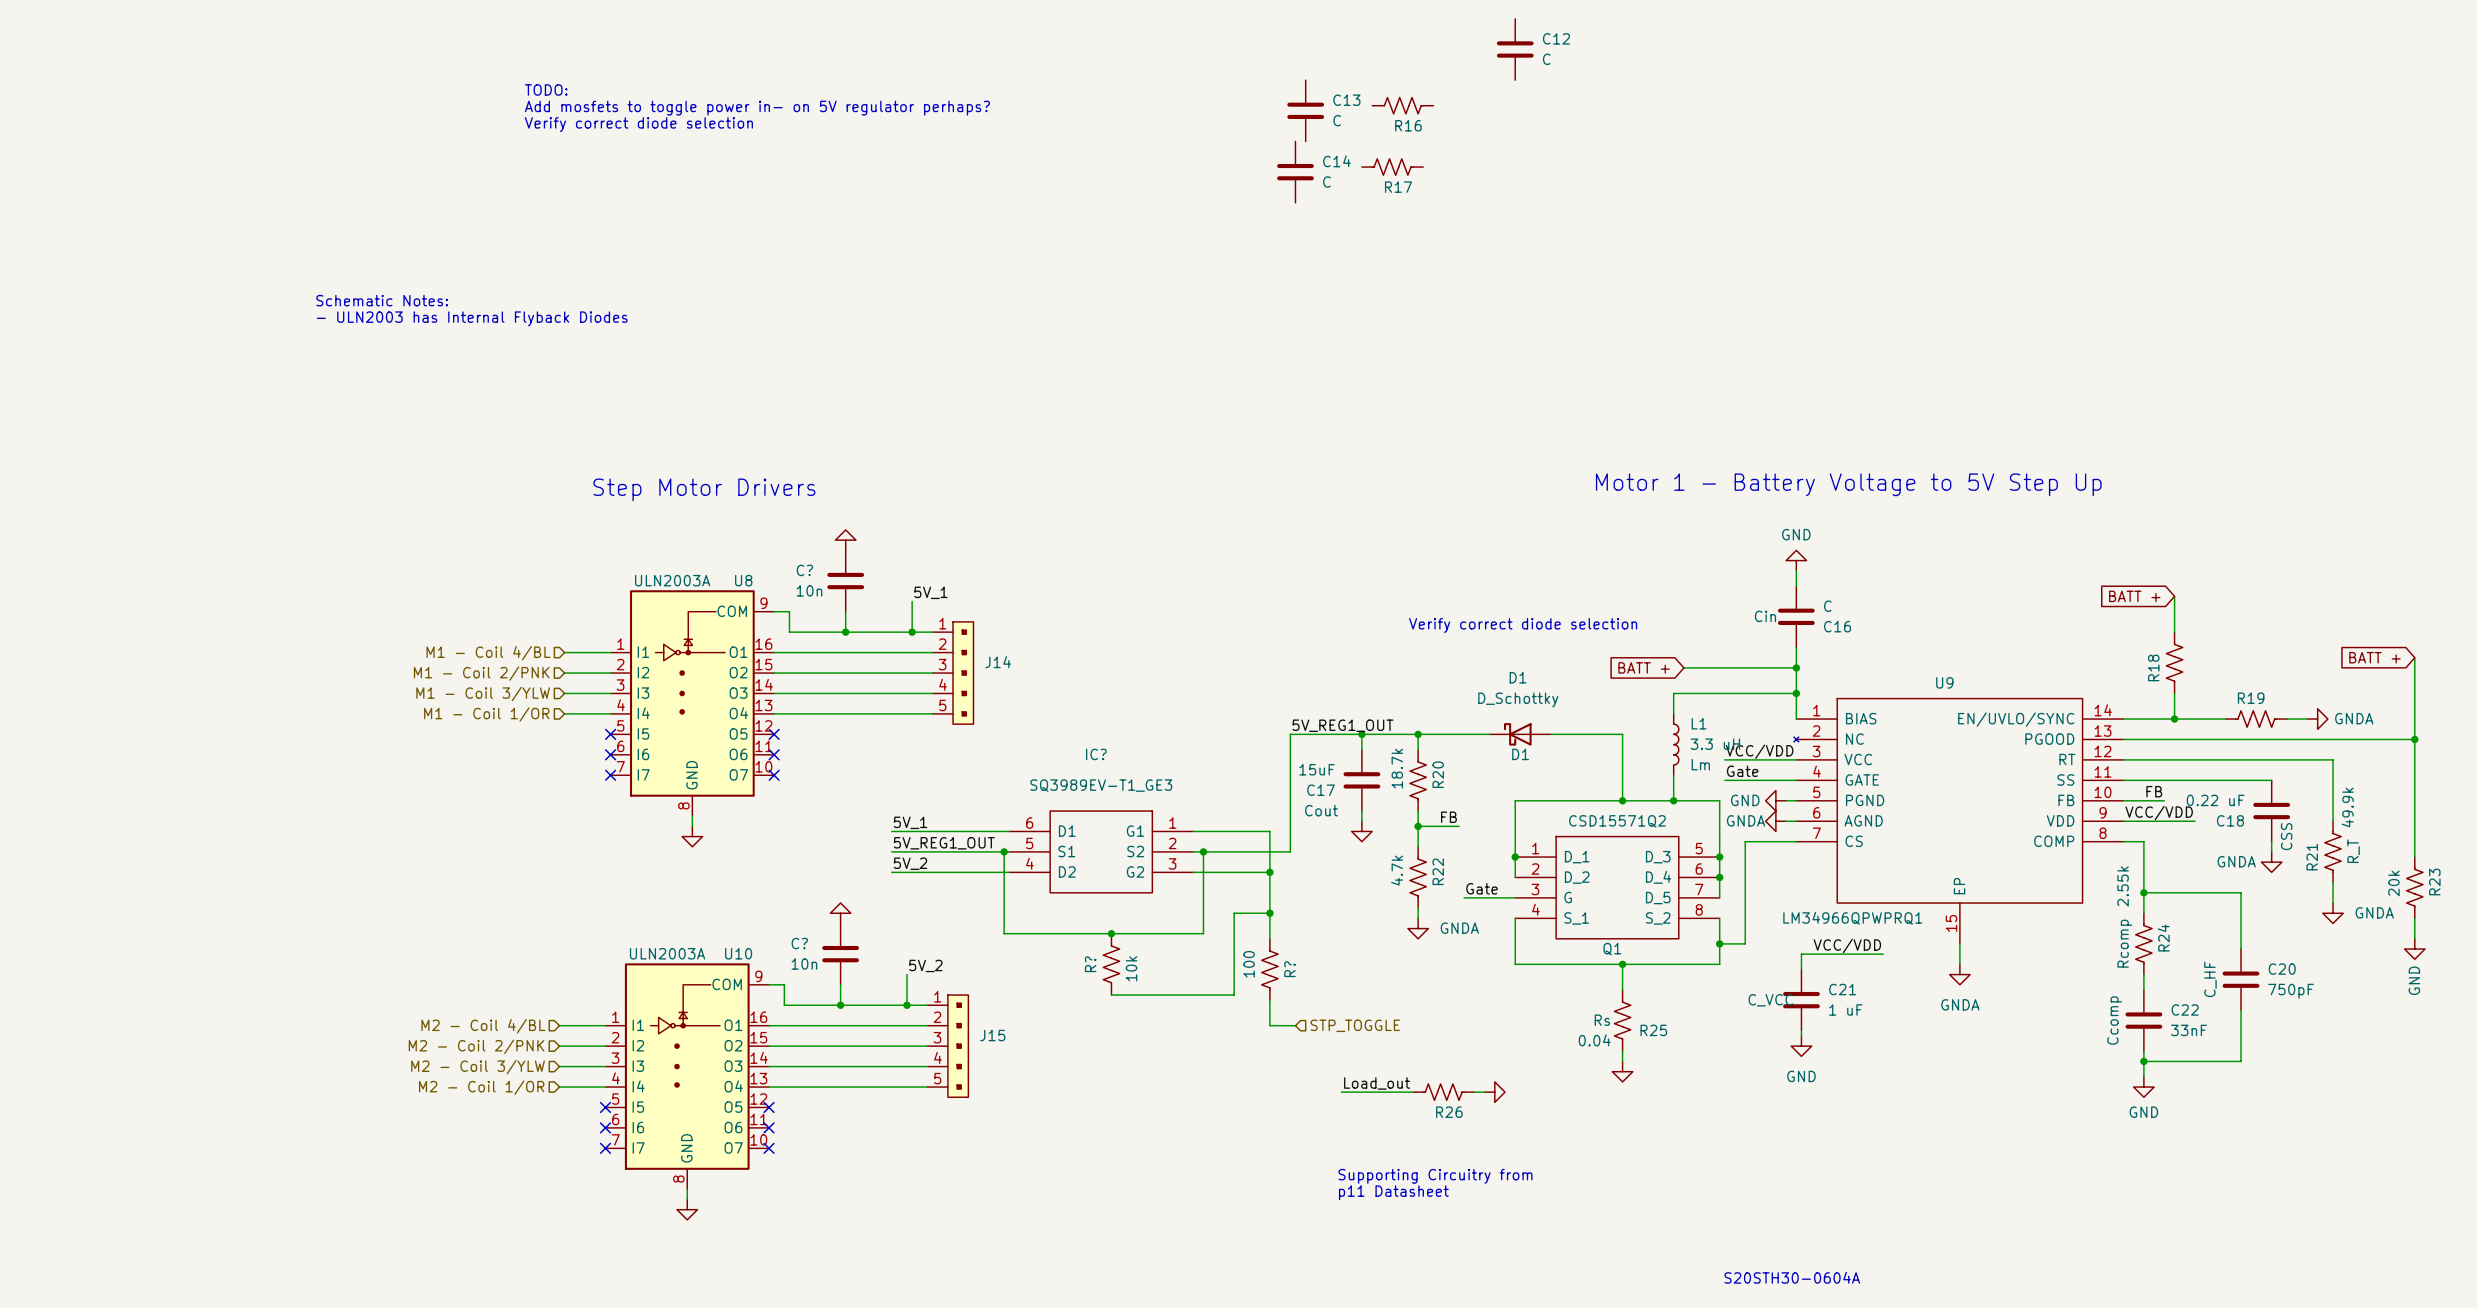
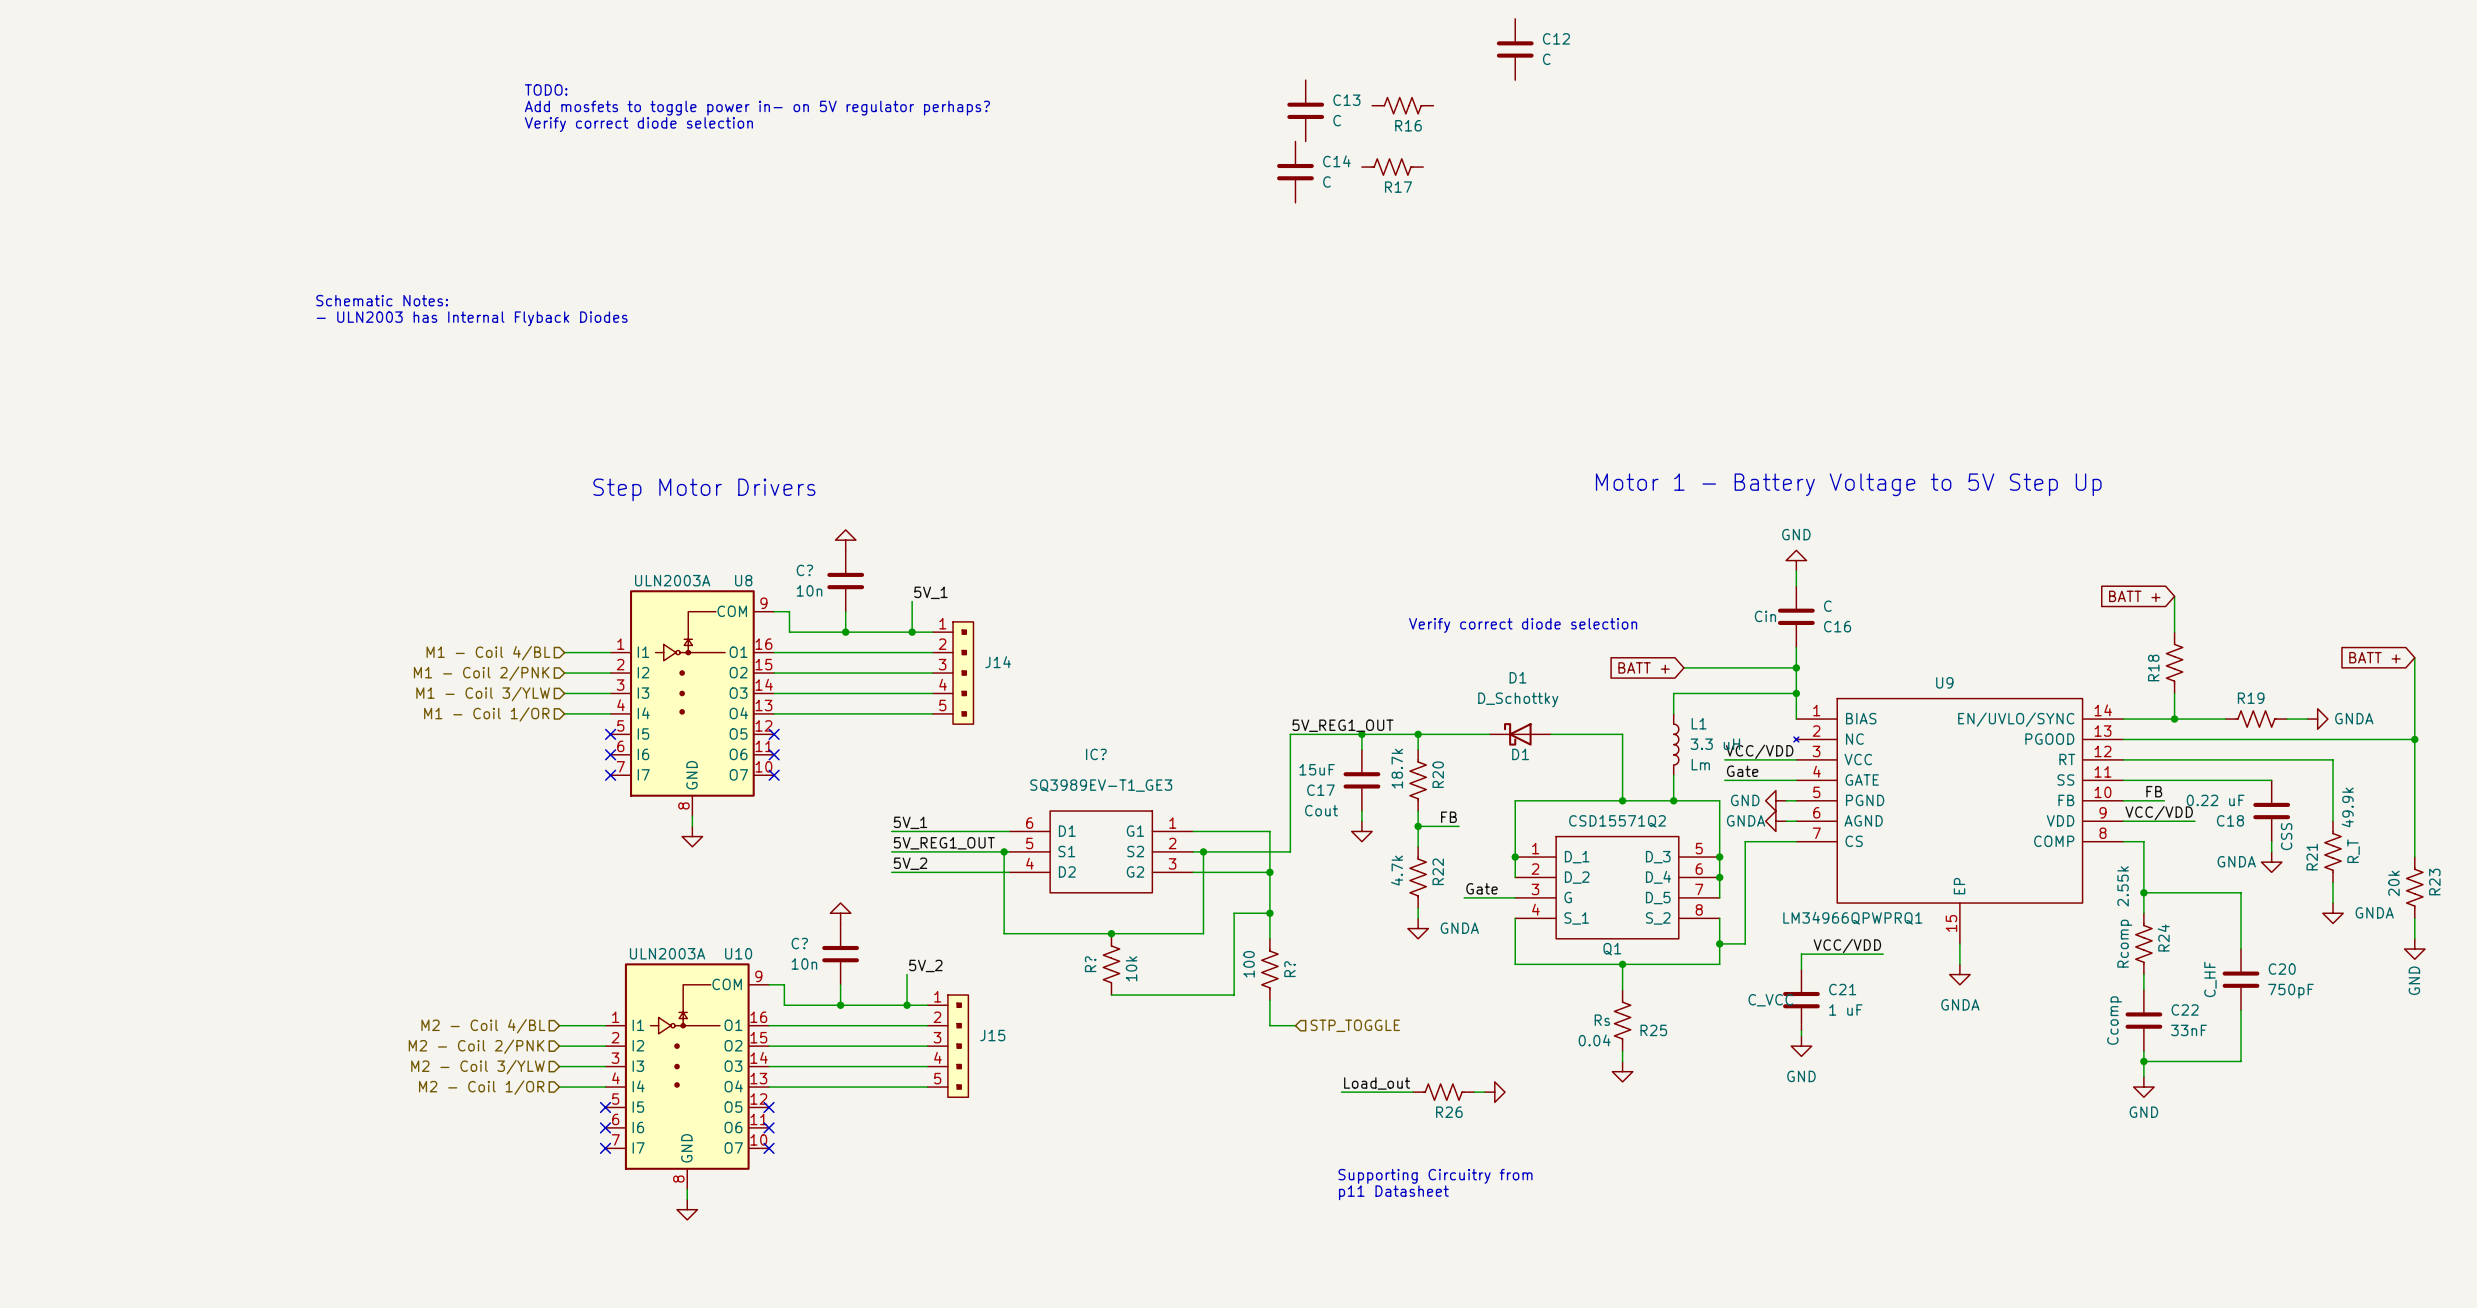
text: S20STH30-0604A (1792, 1277) -> none

